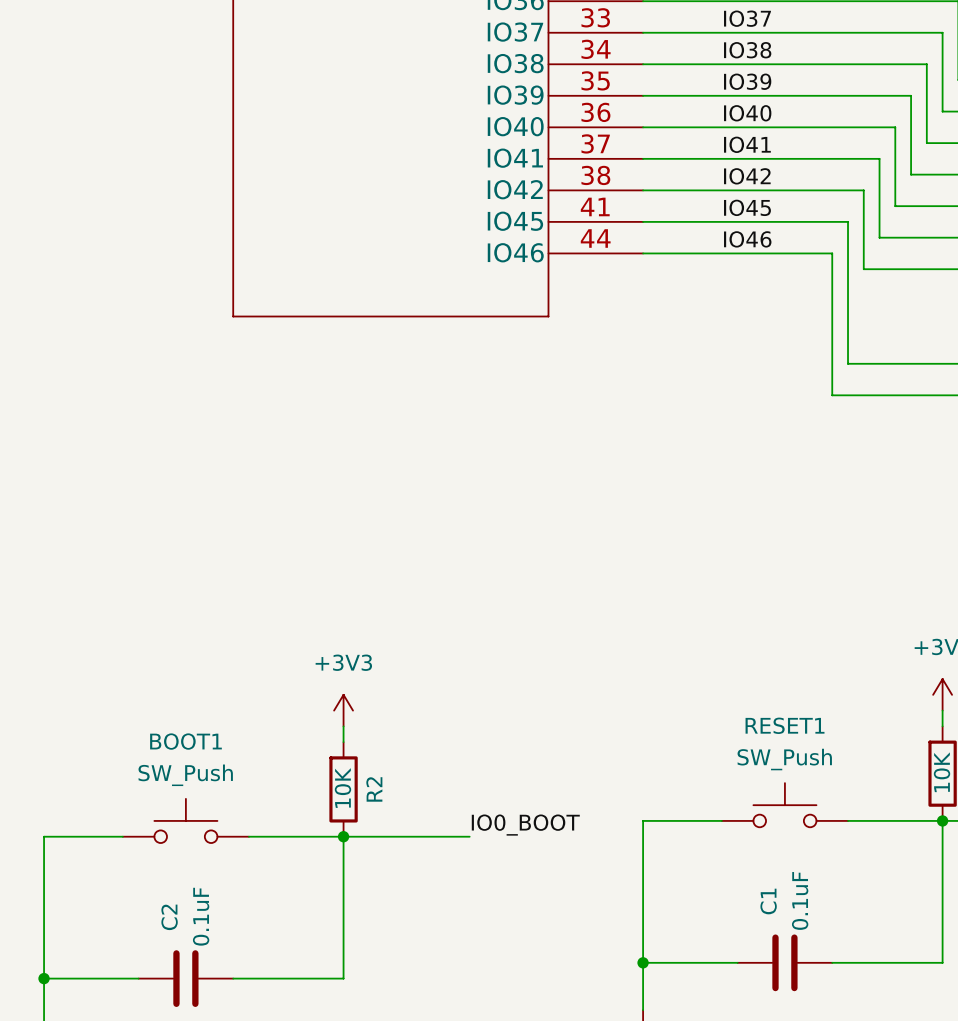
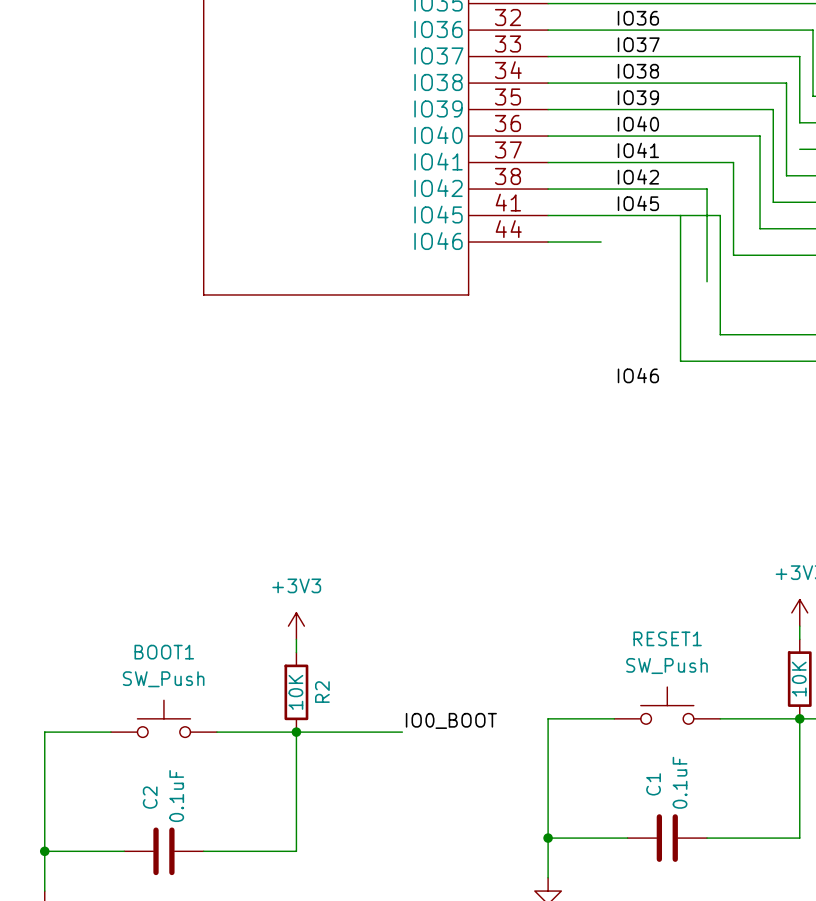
wire: (926, 143) (942, 143) -> (786, 149) (786, 175)
wire: (863, 158) (879, 158) (879, 237) (895, 237) -> none
wire: (911, 174) (926, 174) -> (773, 175) (773, 202)
wire: (832, 190) (863, 190) -> (733, 162) (733, 189)
wire: (895, 206) (911, 206) -> (760, 202) (760, 228)
label position: IO46 (747, 239) -> IO46 (638, 375)
wire: (706, 253) (832, 253) -> (707, 189) (707, 242)
wire: (832, 300) (832, 395) -> (680, 215) (680, 361) (707, 361)

